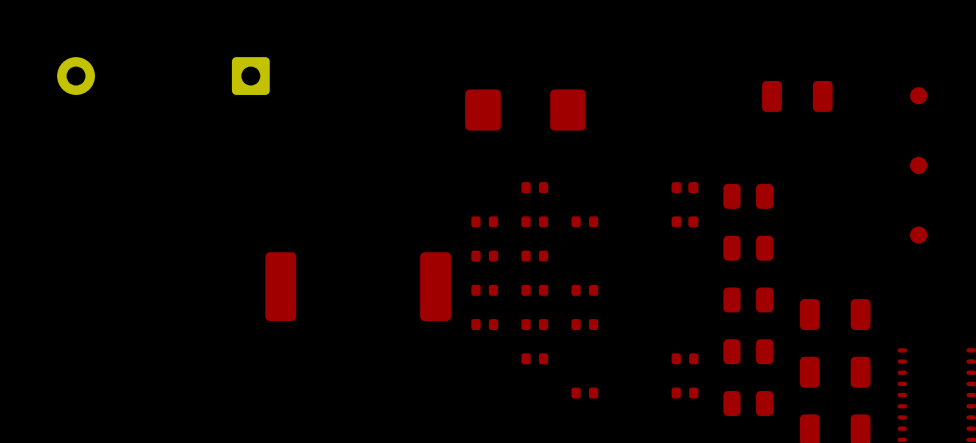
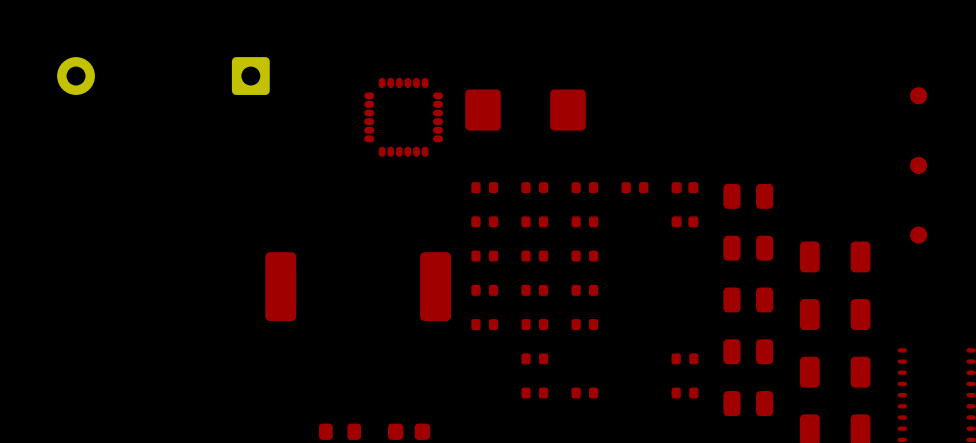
part position: (797, 96) -> (835, 256)
part: none -> (403, 117)
part: none -> (484, 187)
part: none -> (584, 187)
part: none -> (634, 187)
part: none -> (584, 256)
part: none -> (534, 393)
part: none -> (340, 431)
part: none -> (409, 431)

